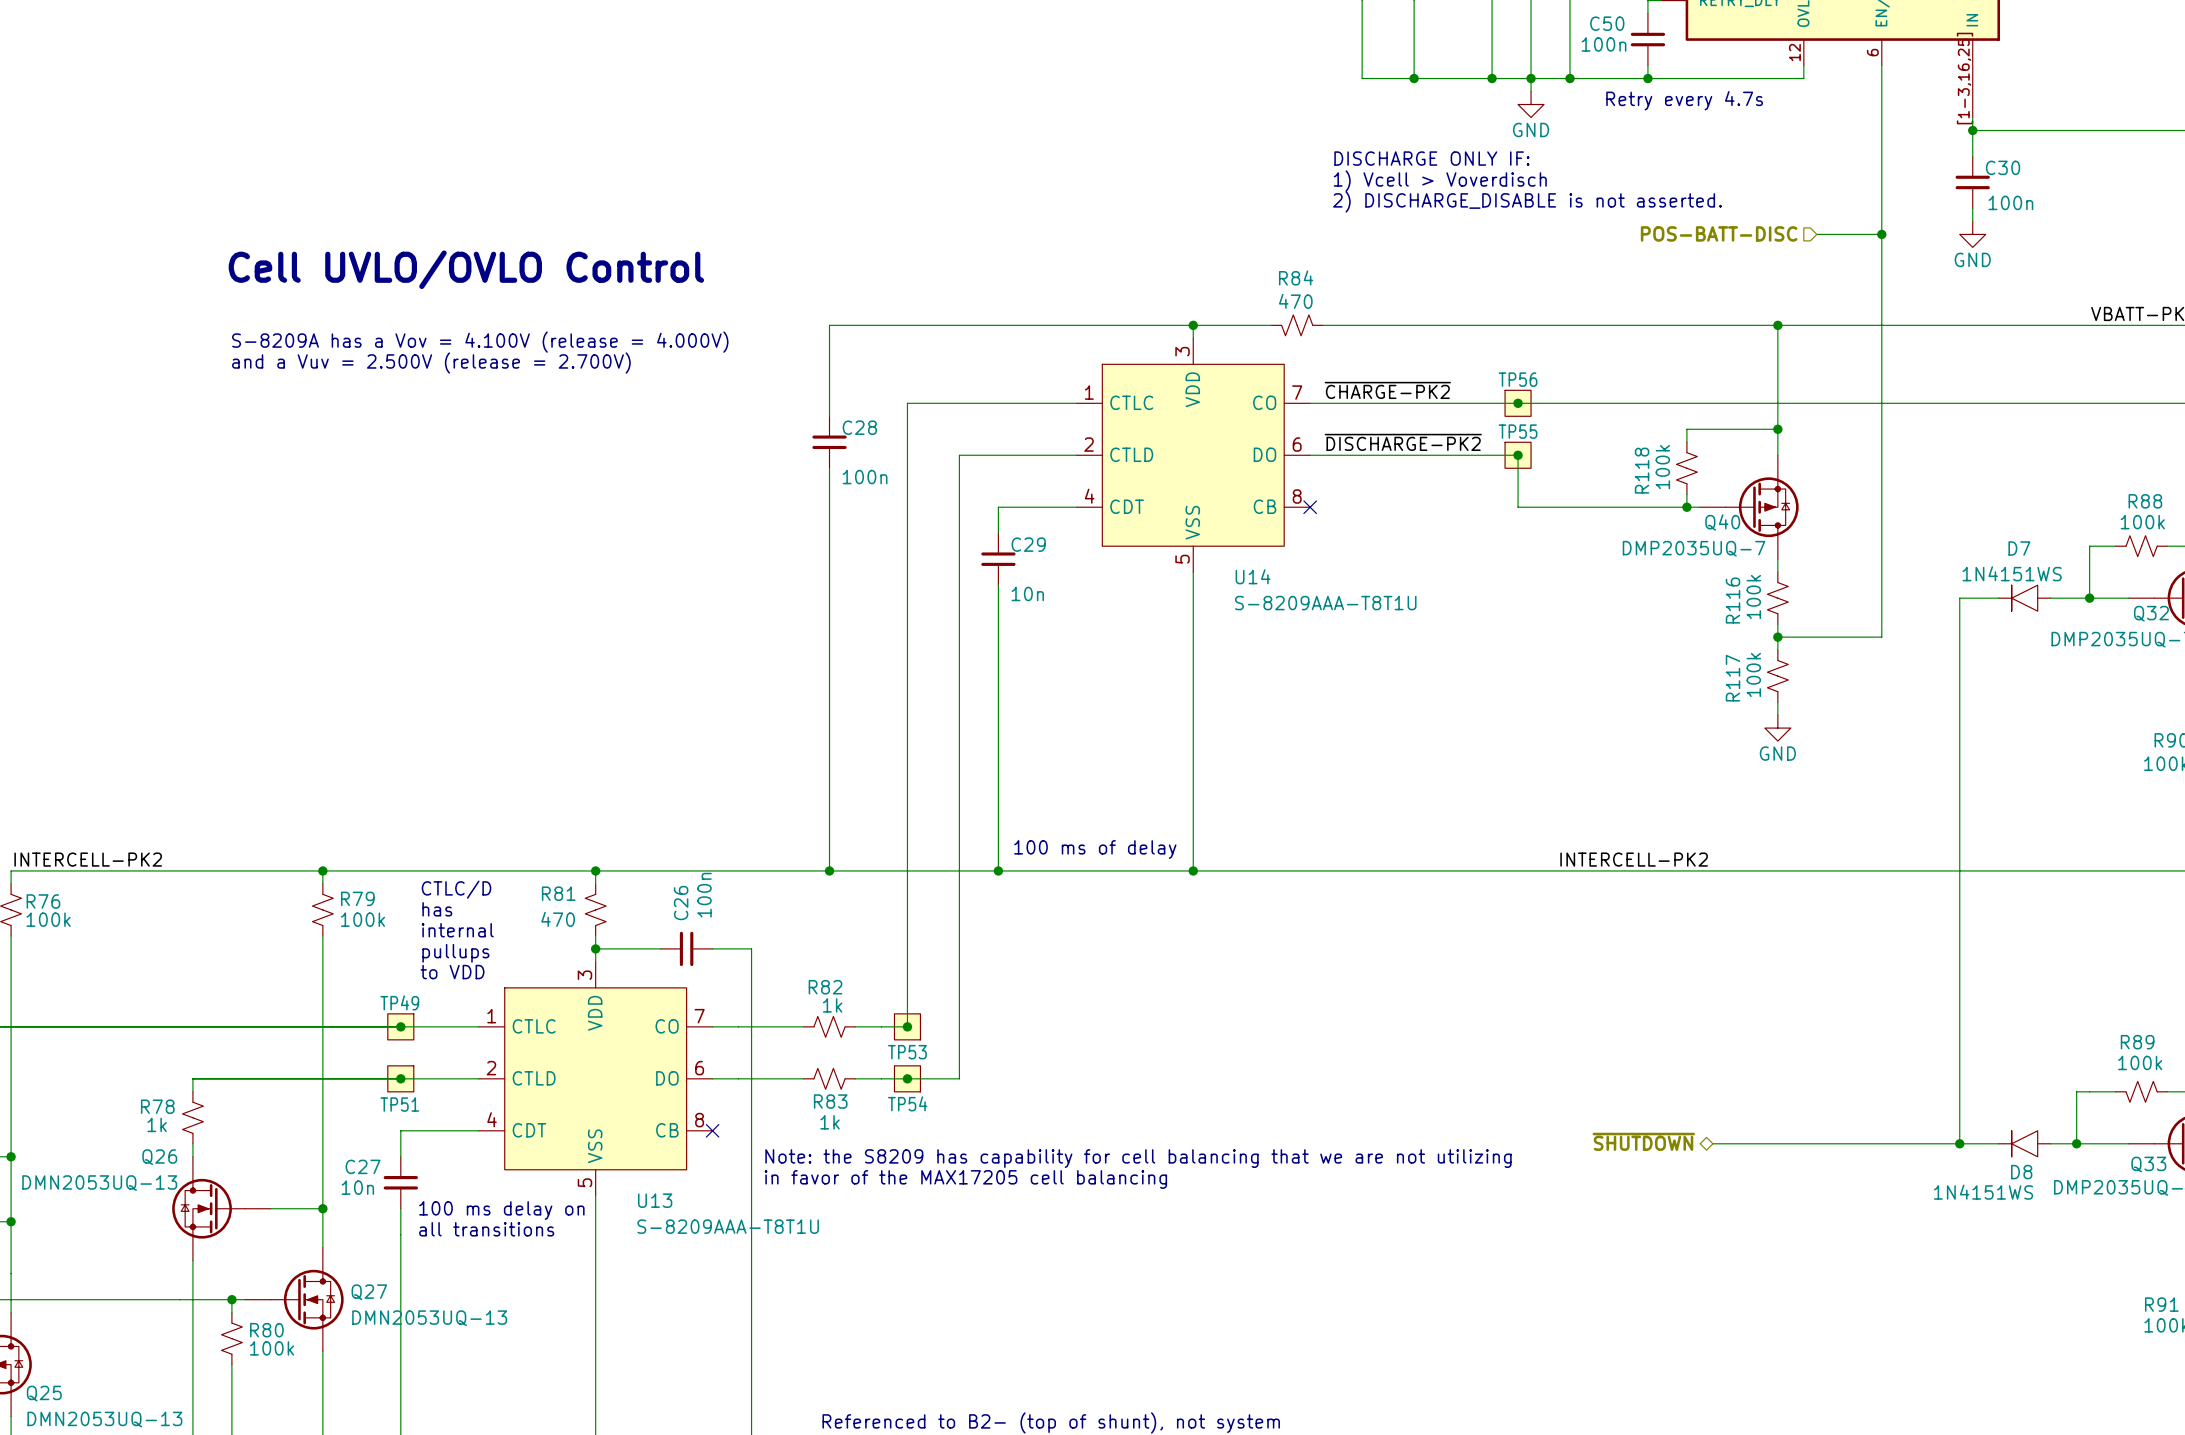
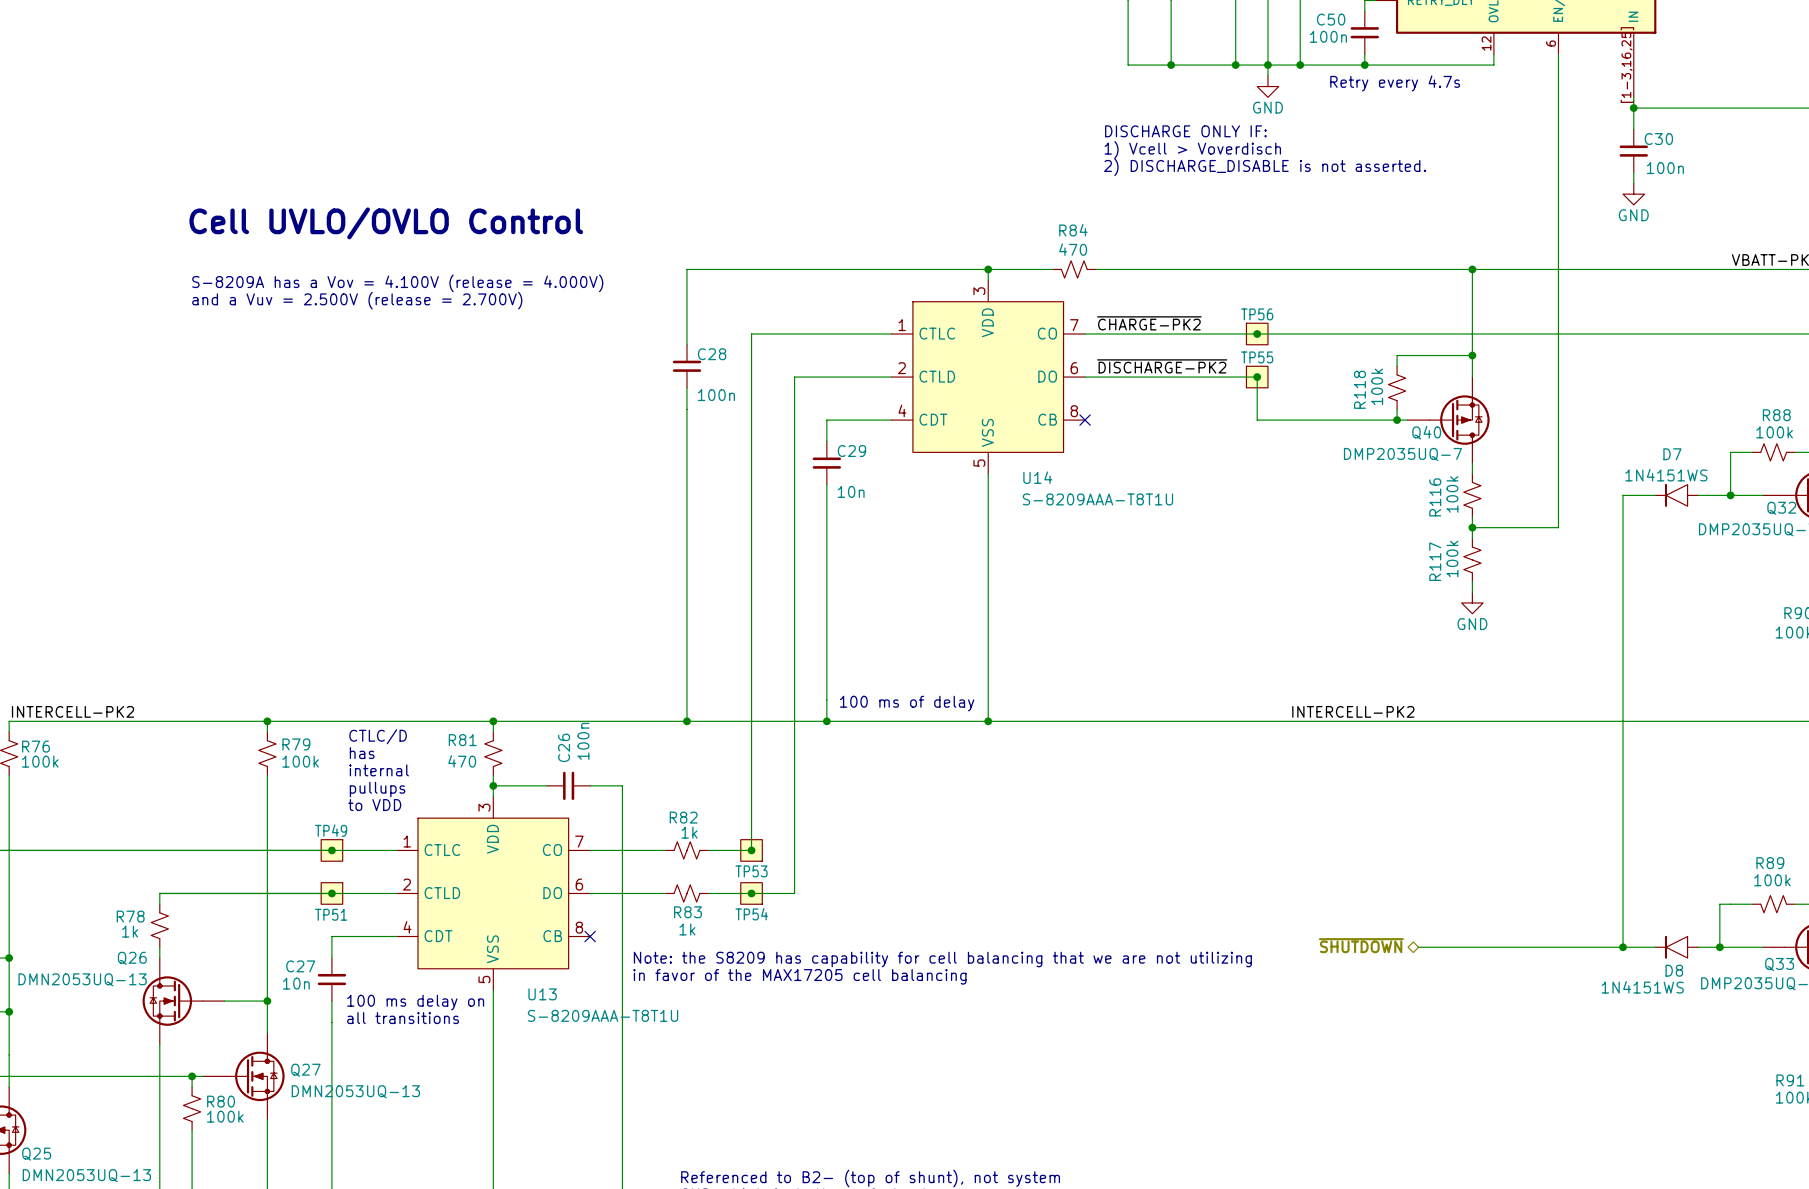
hierarchical label: POS-BATT-DISC (1719, 233) -> none
wire: (1816, 234) (1881, 234) -> none
junction: (1881, 234) -> none

